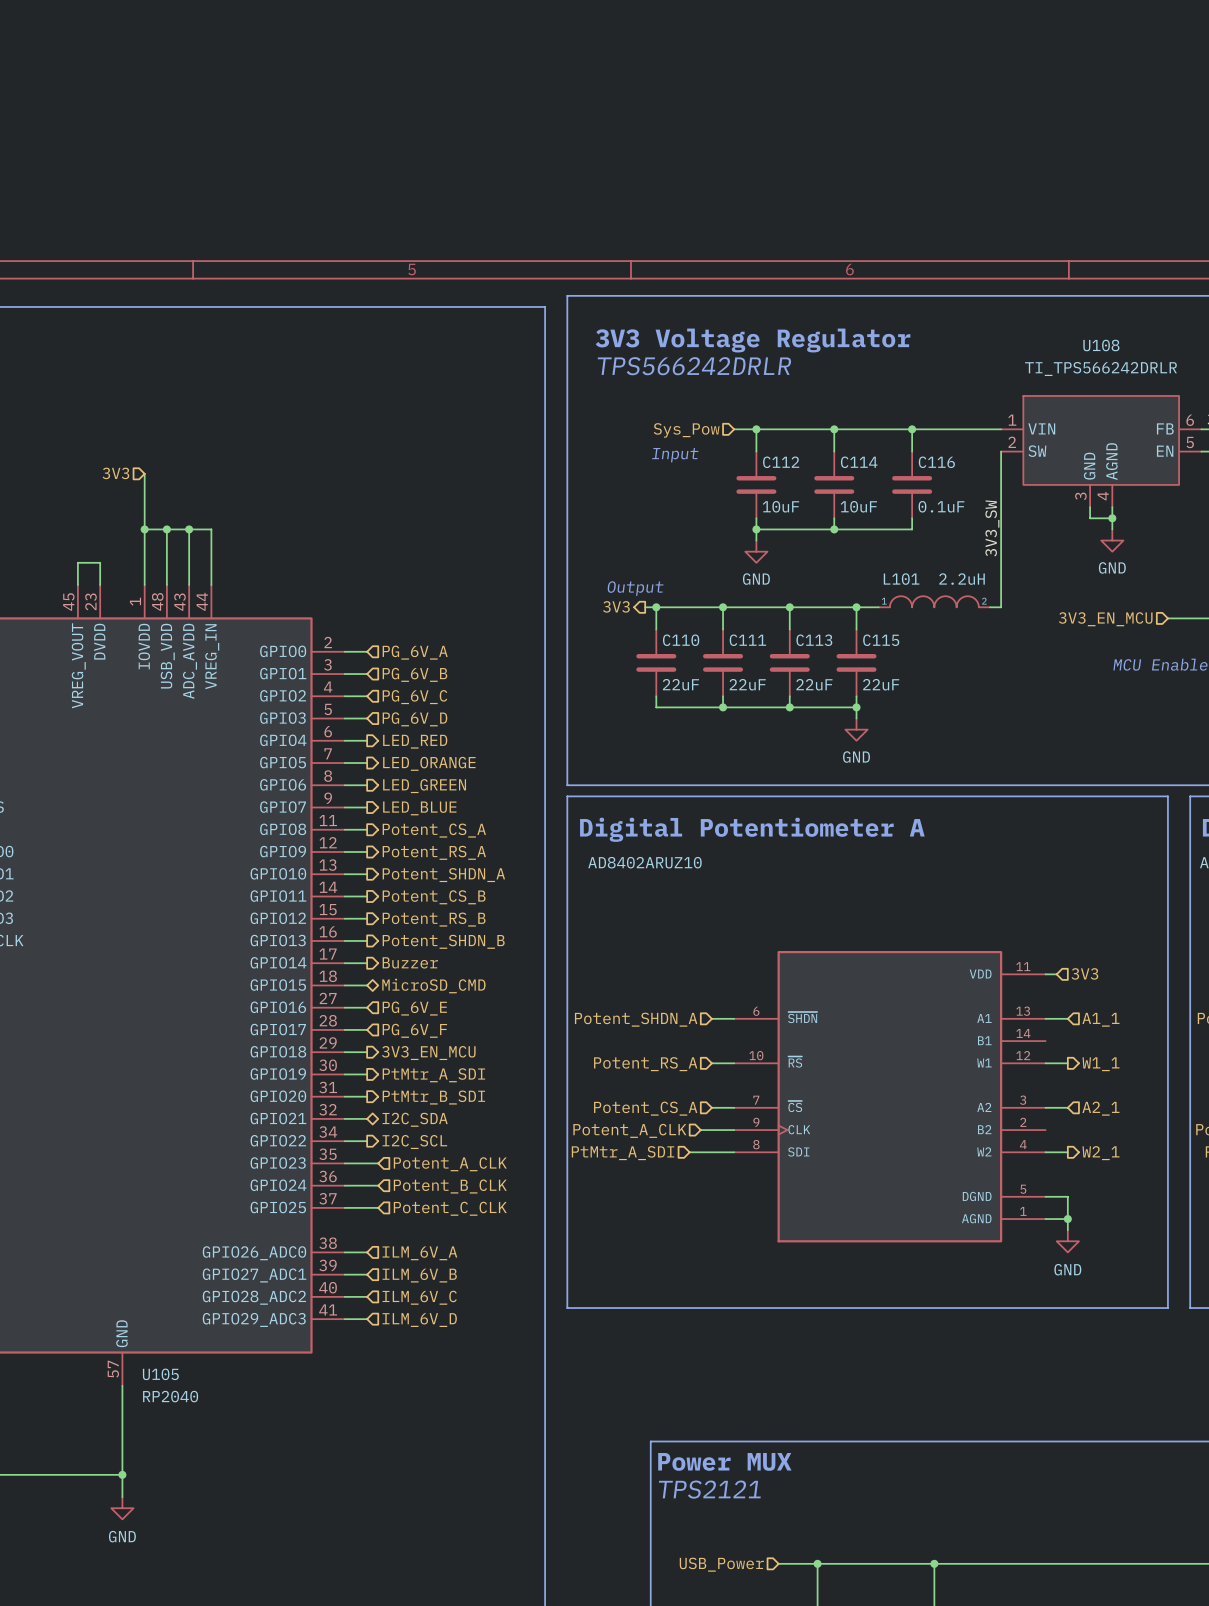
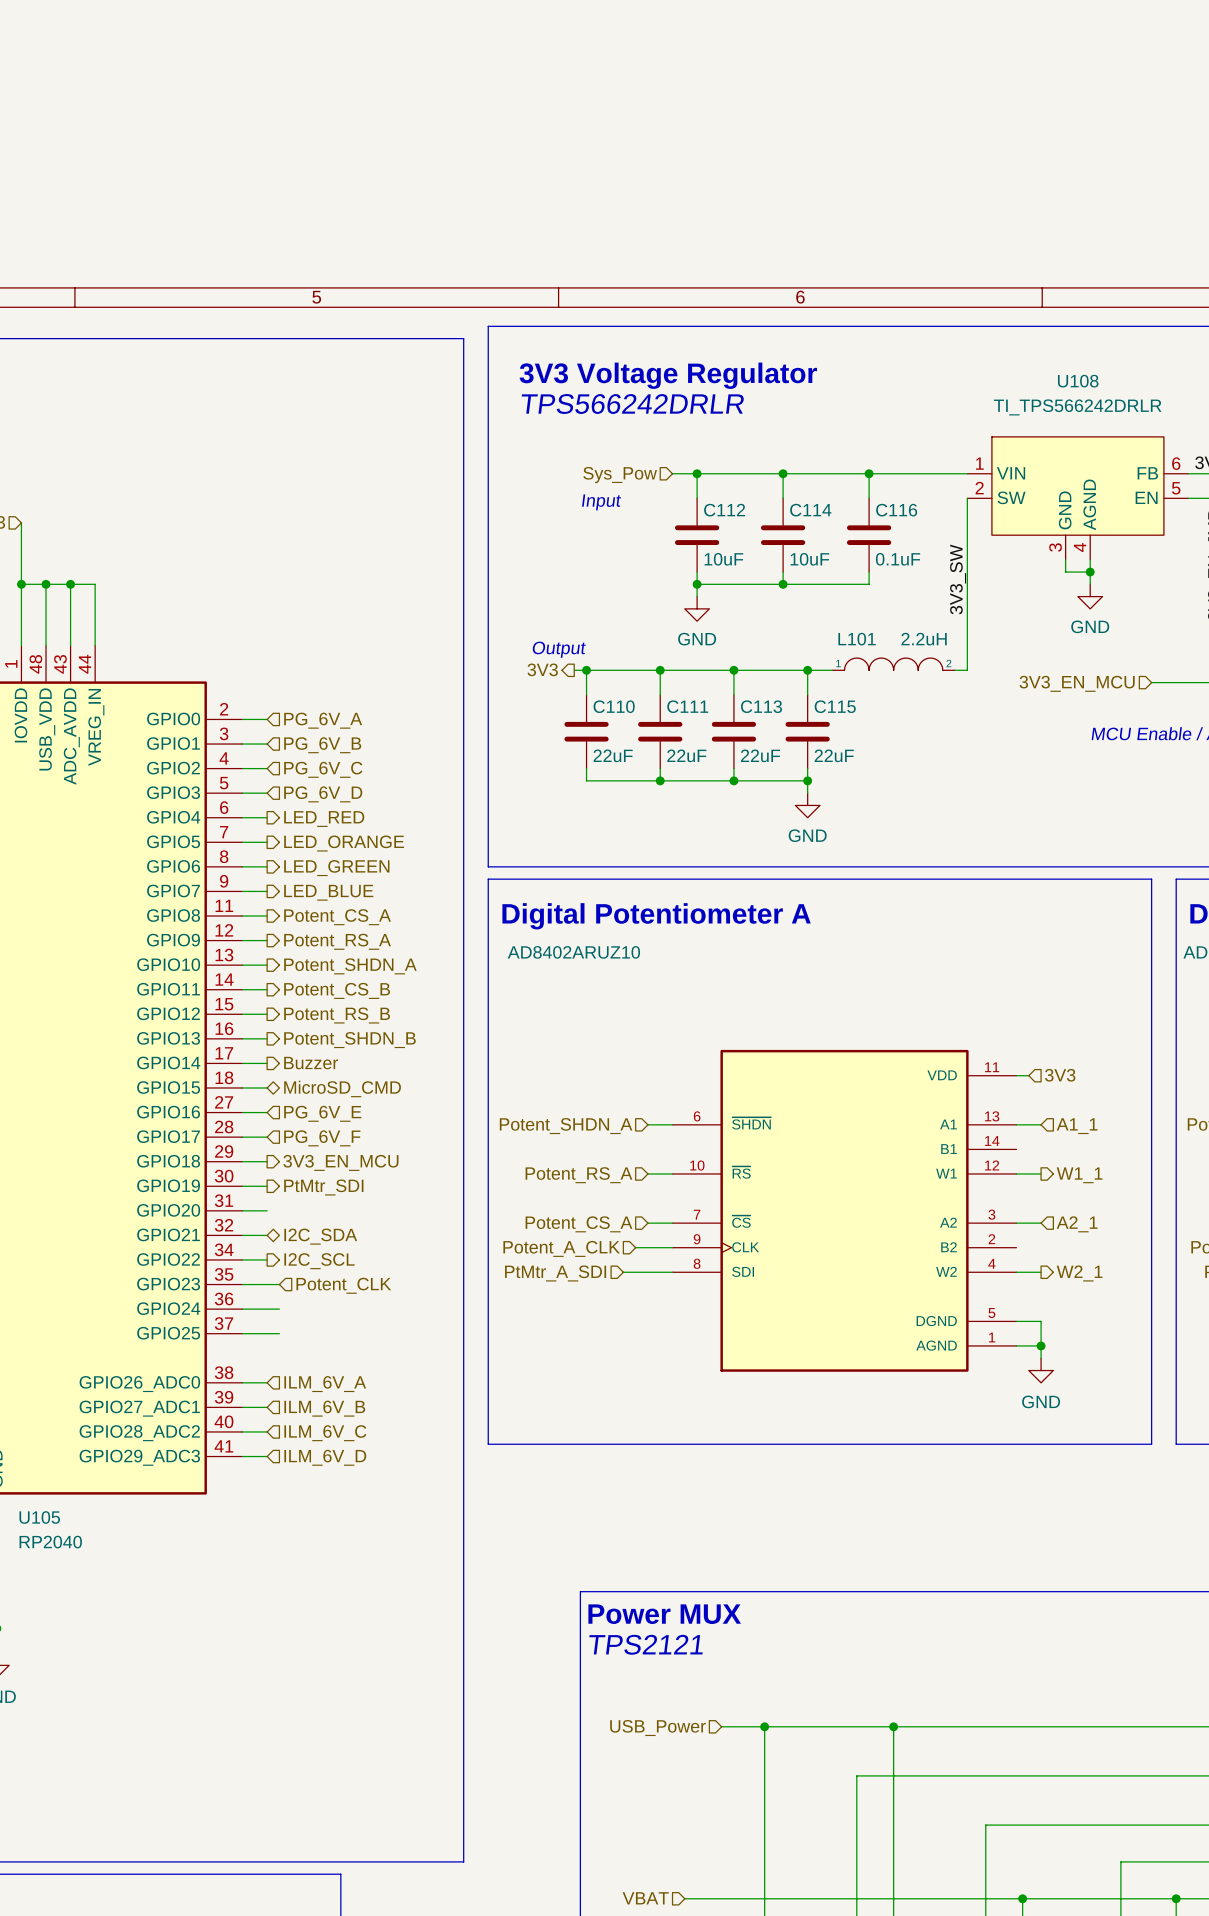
hierarchical label: PtMtr_A_SDI (433, 1075) -> PtMtr_SDI (323, 1187)
hierarchical label: PtMtr_B_SDI (433, 1097) -> none
hierarchical label: Potent_A_CLK (450, 1164) -> Potent_CLK (343, 1285)
hierarchical label: Potent_B_CLK (450, 1186) -> none
hierarchical label: Potent_C_CLK (450, 1208) -> none

